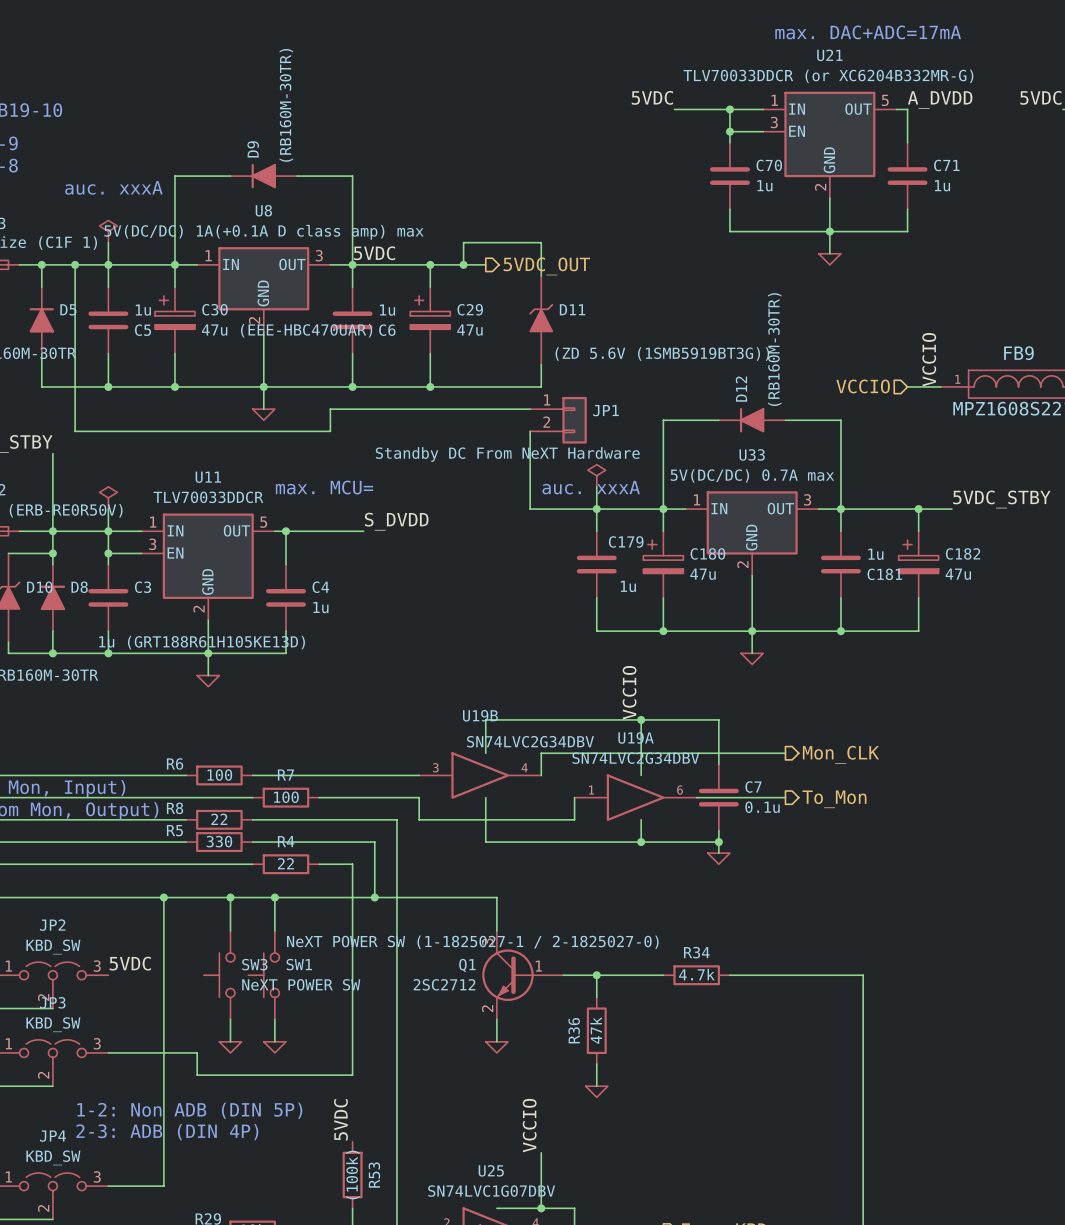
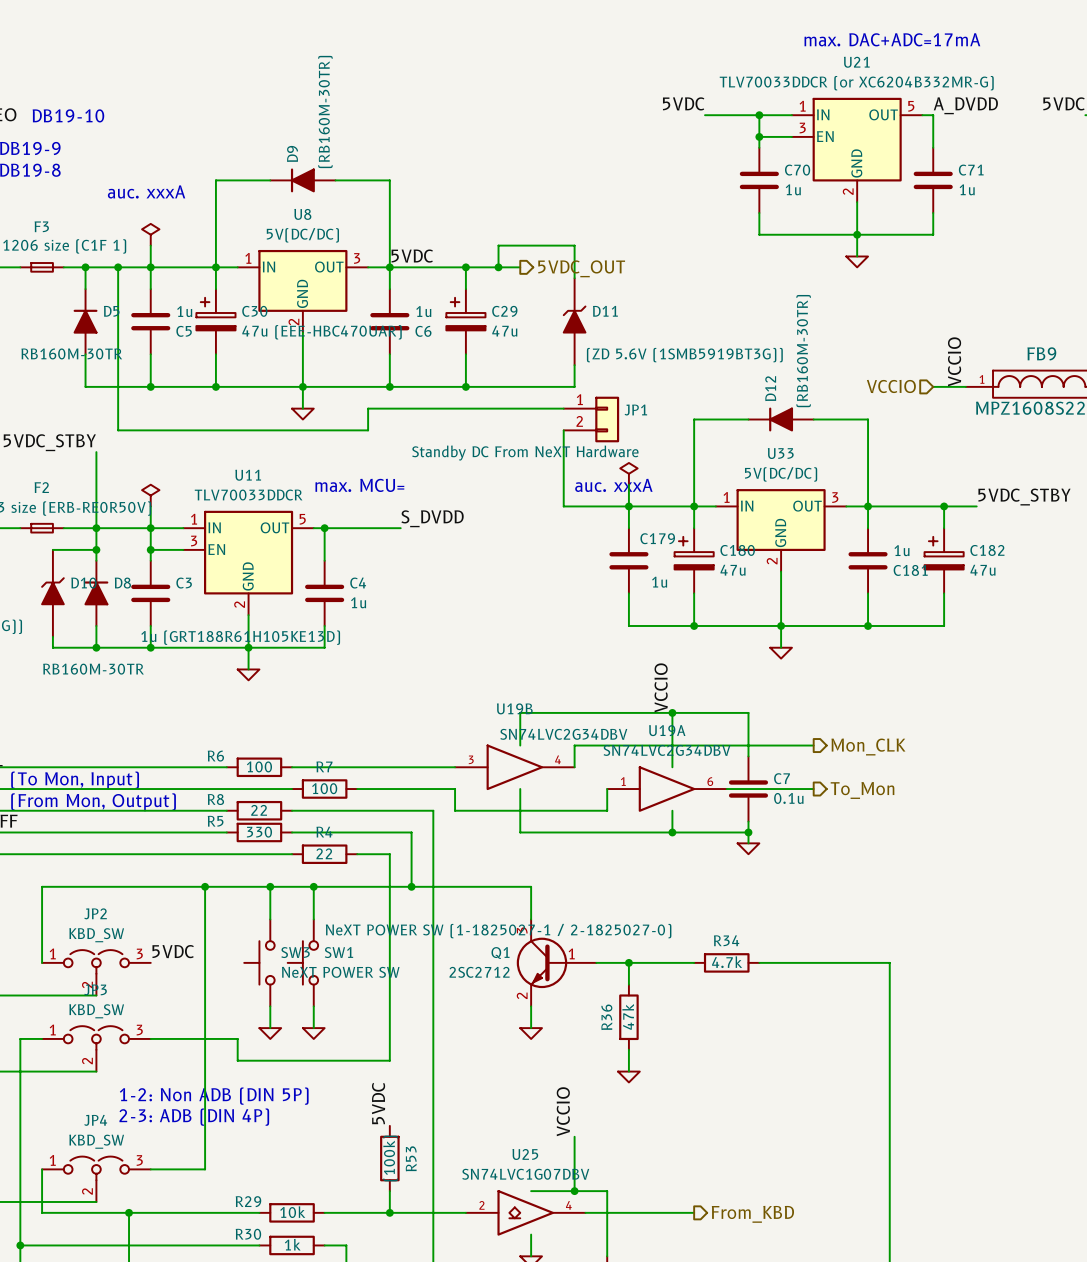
U8 value: 5V(DC/DC) 1A(+0.1A D class amp) max (264, 232) -> 5V(DC/DC) (302, 235)
U33 value: 5V(DC/DC) 0.7A max (752, 475) -> 5V(DC/DC) (781, 474)

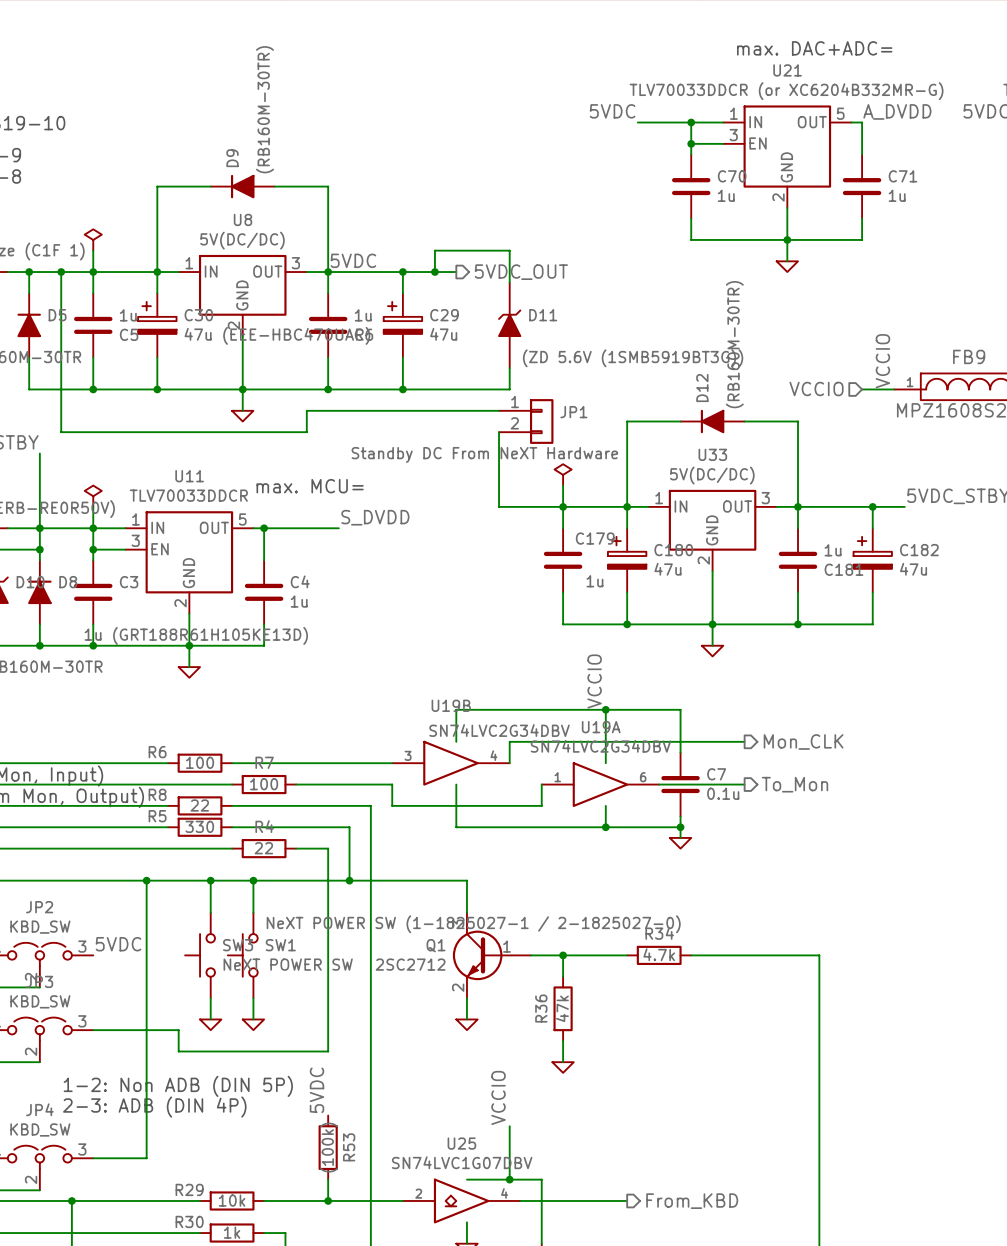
text: max. DAC+ADC=17mA (892, 39) -> max. DAC+ADC= (814, 48)
text: auc. xxxA (146, 191) -> none
text: auc. xxxA (613, 485) -> none

